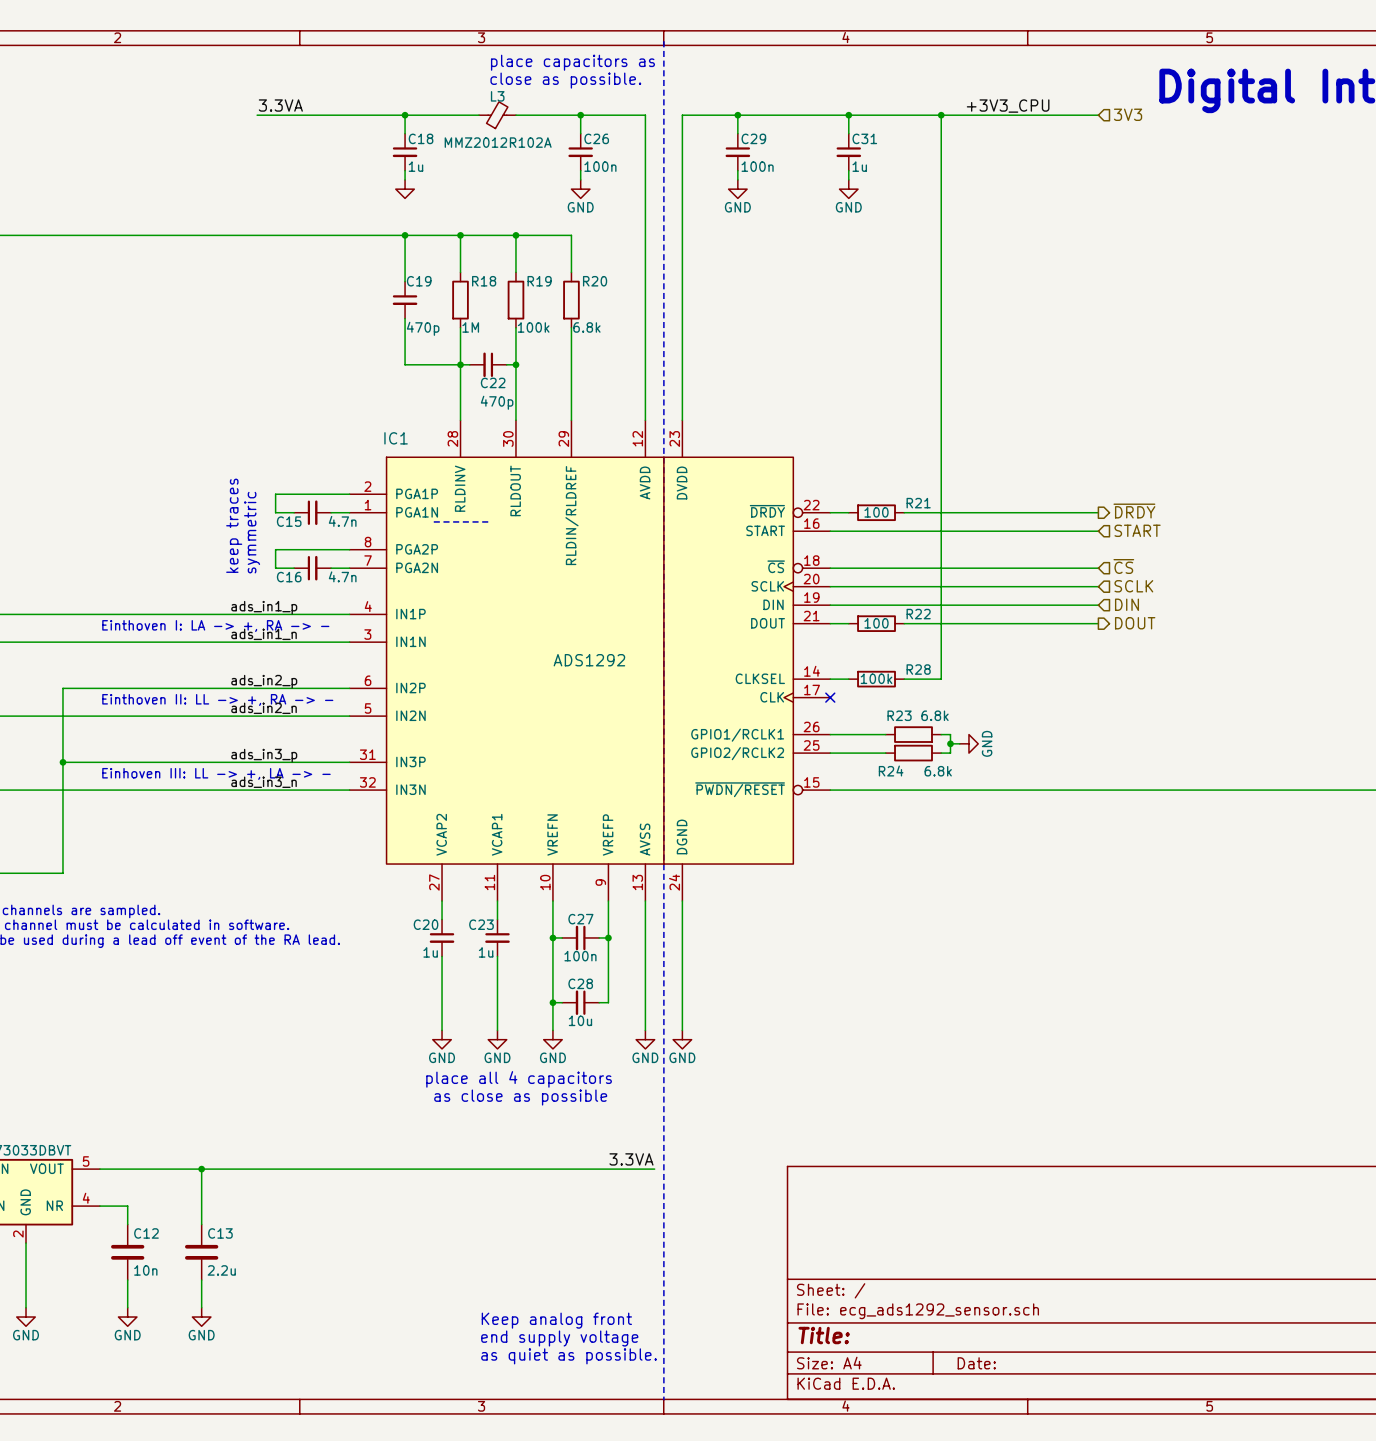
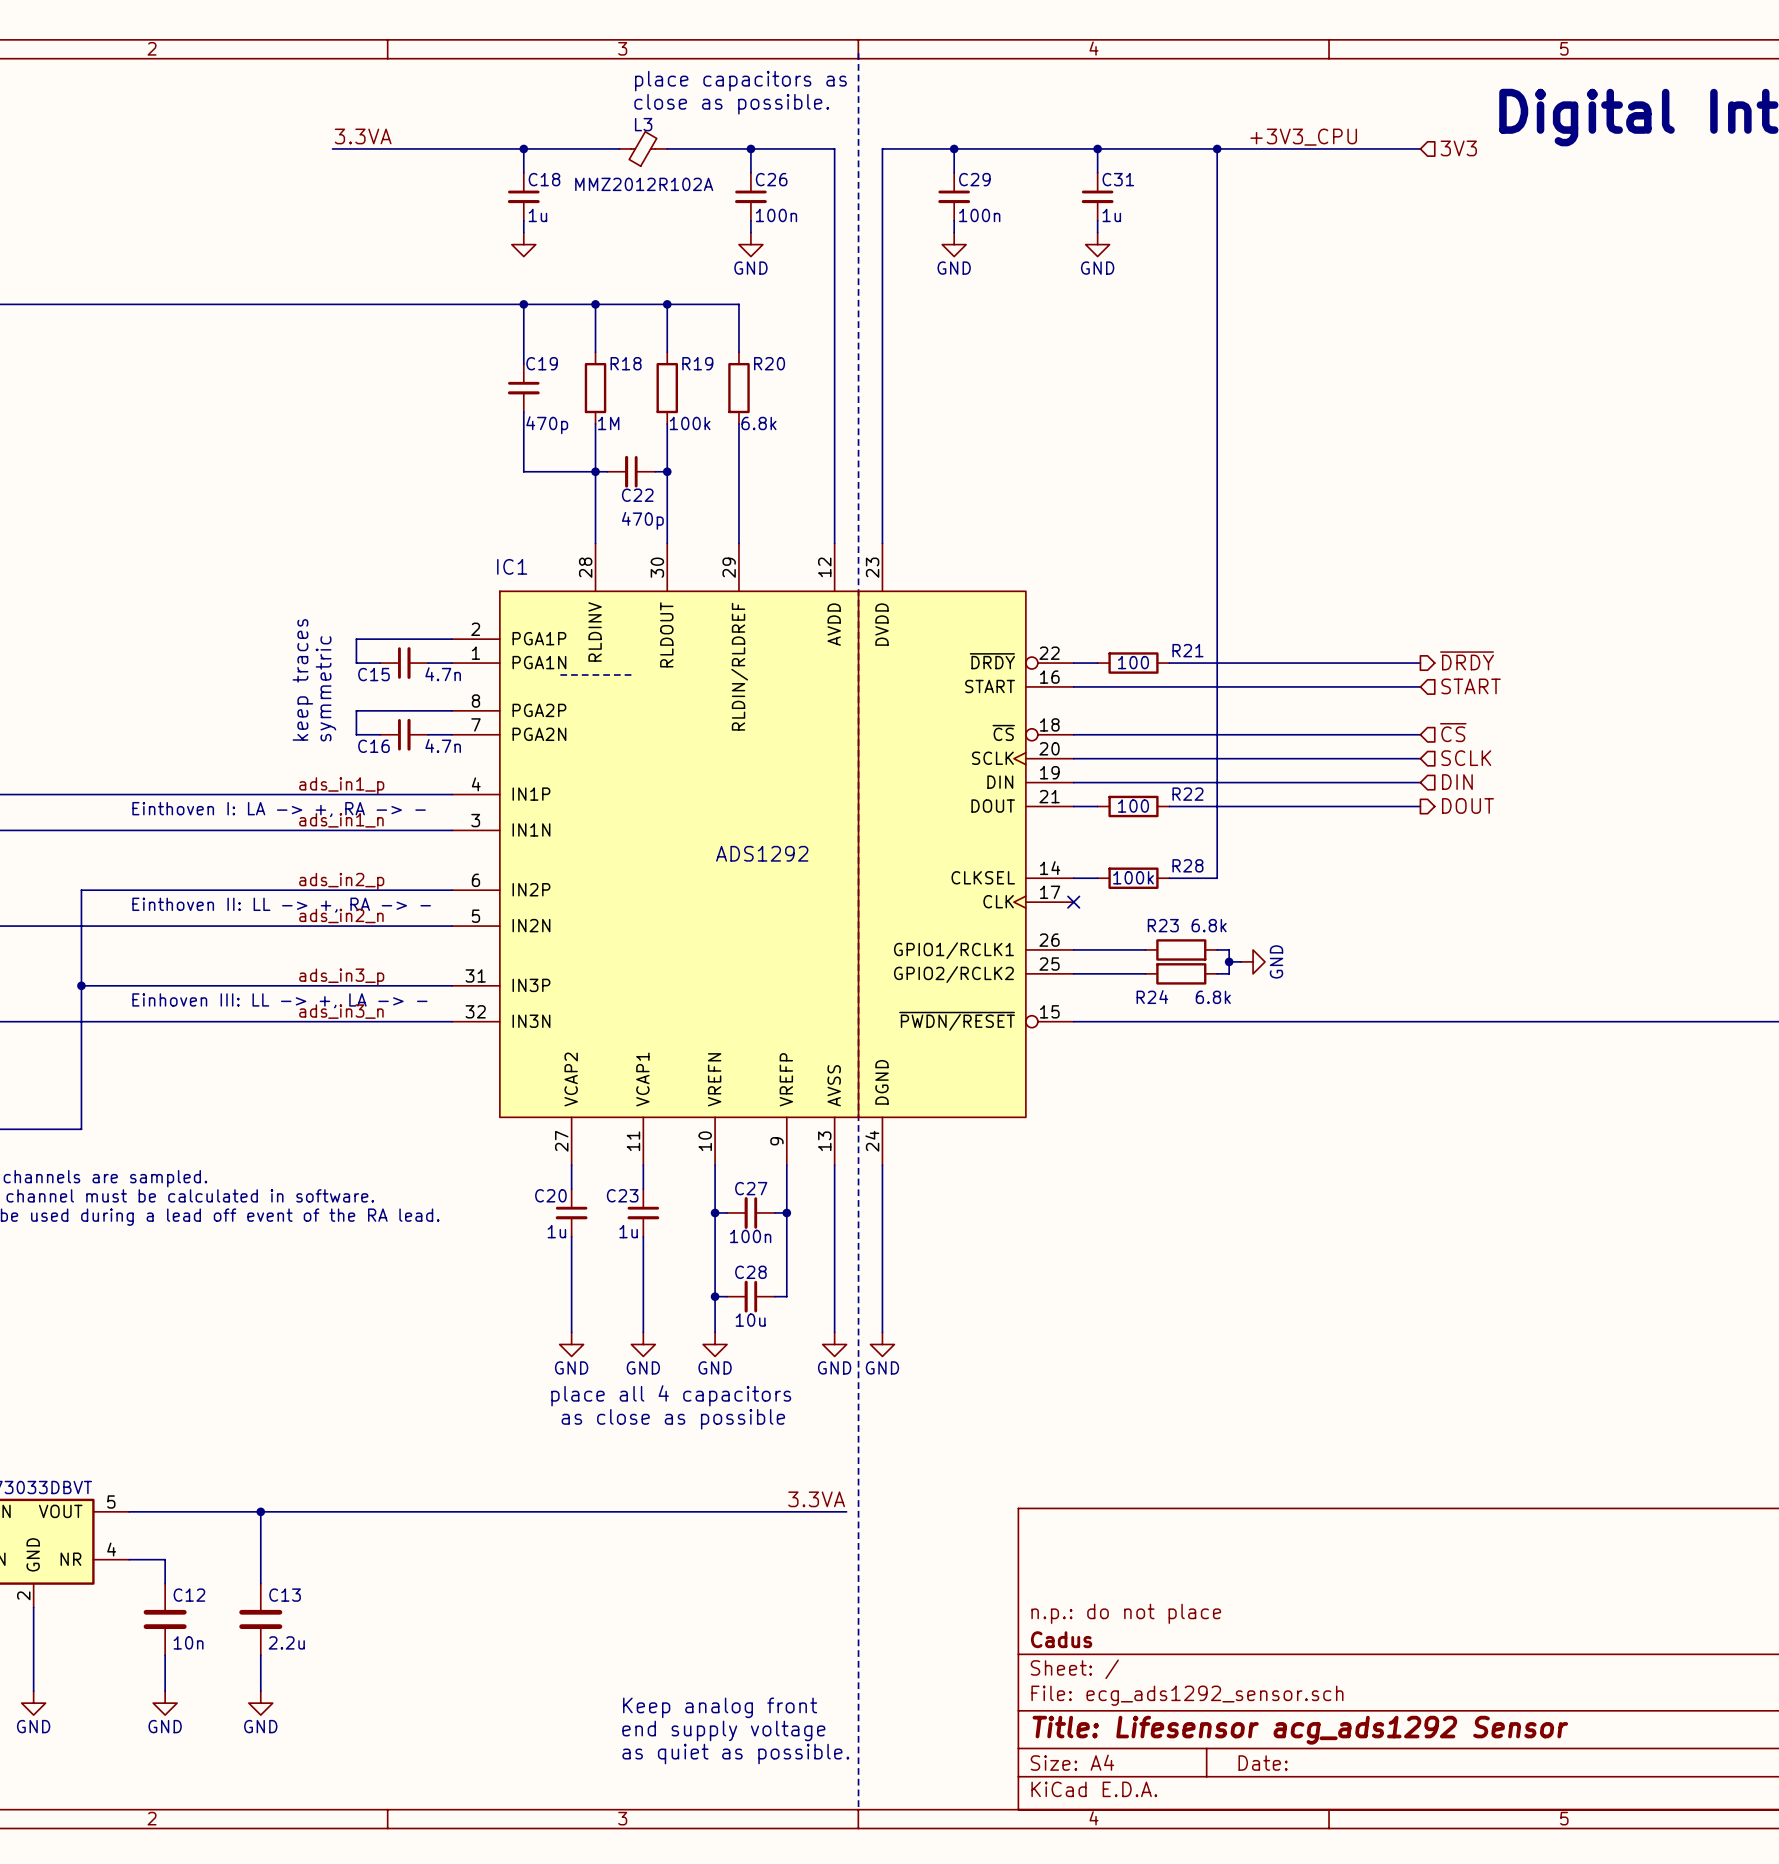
title block: none -> n.p.: do not place (1126, 1613)
title block: none -> Cadus (1061, 1639)
title block: Title: (824, 1335) -> Title: Lifesensor acg_ads1292 Sensor (1300, 1730)

